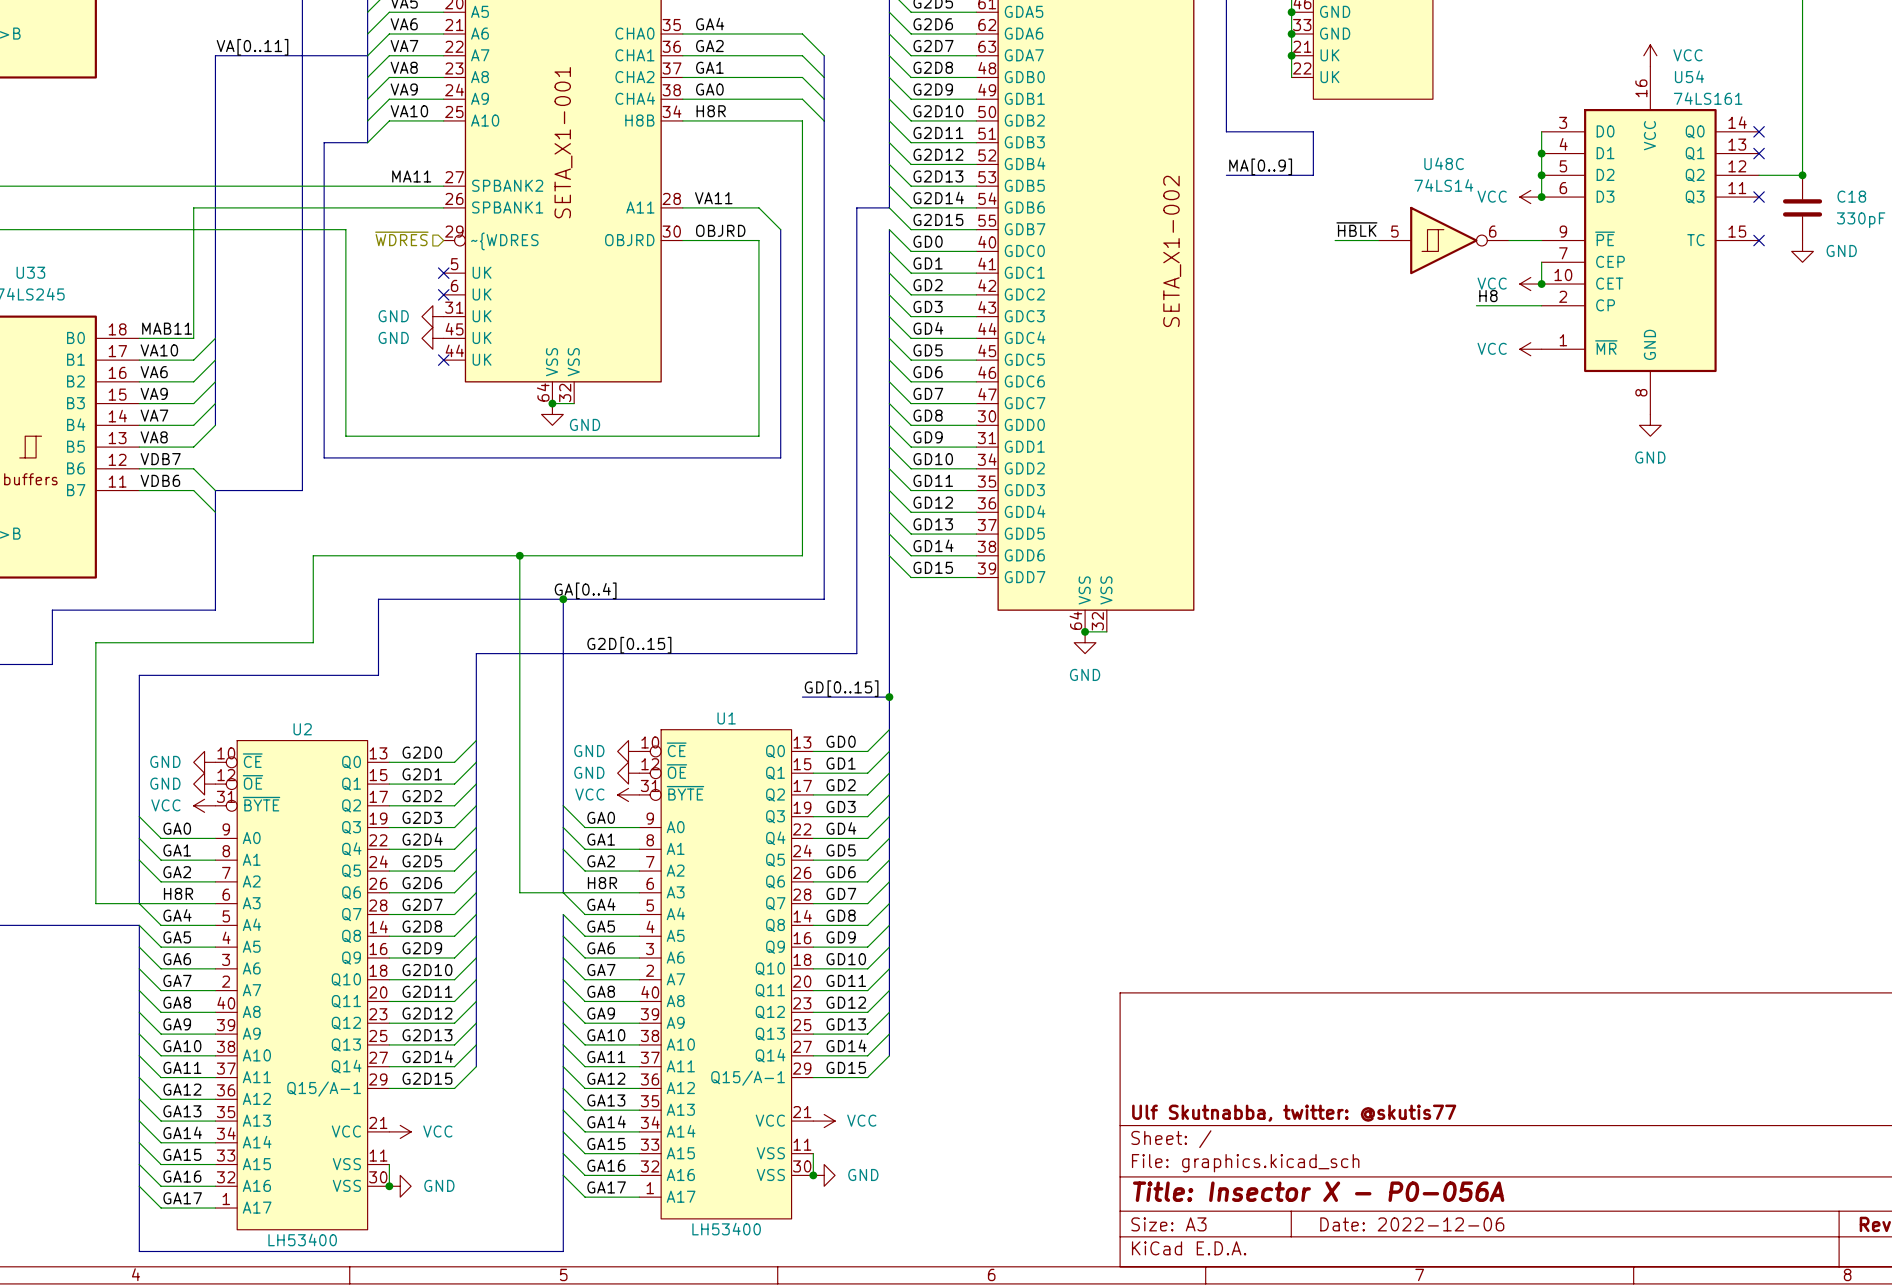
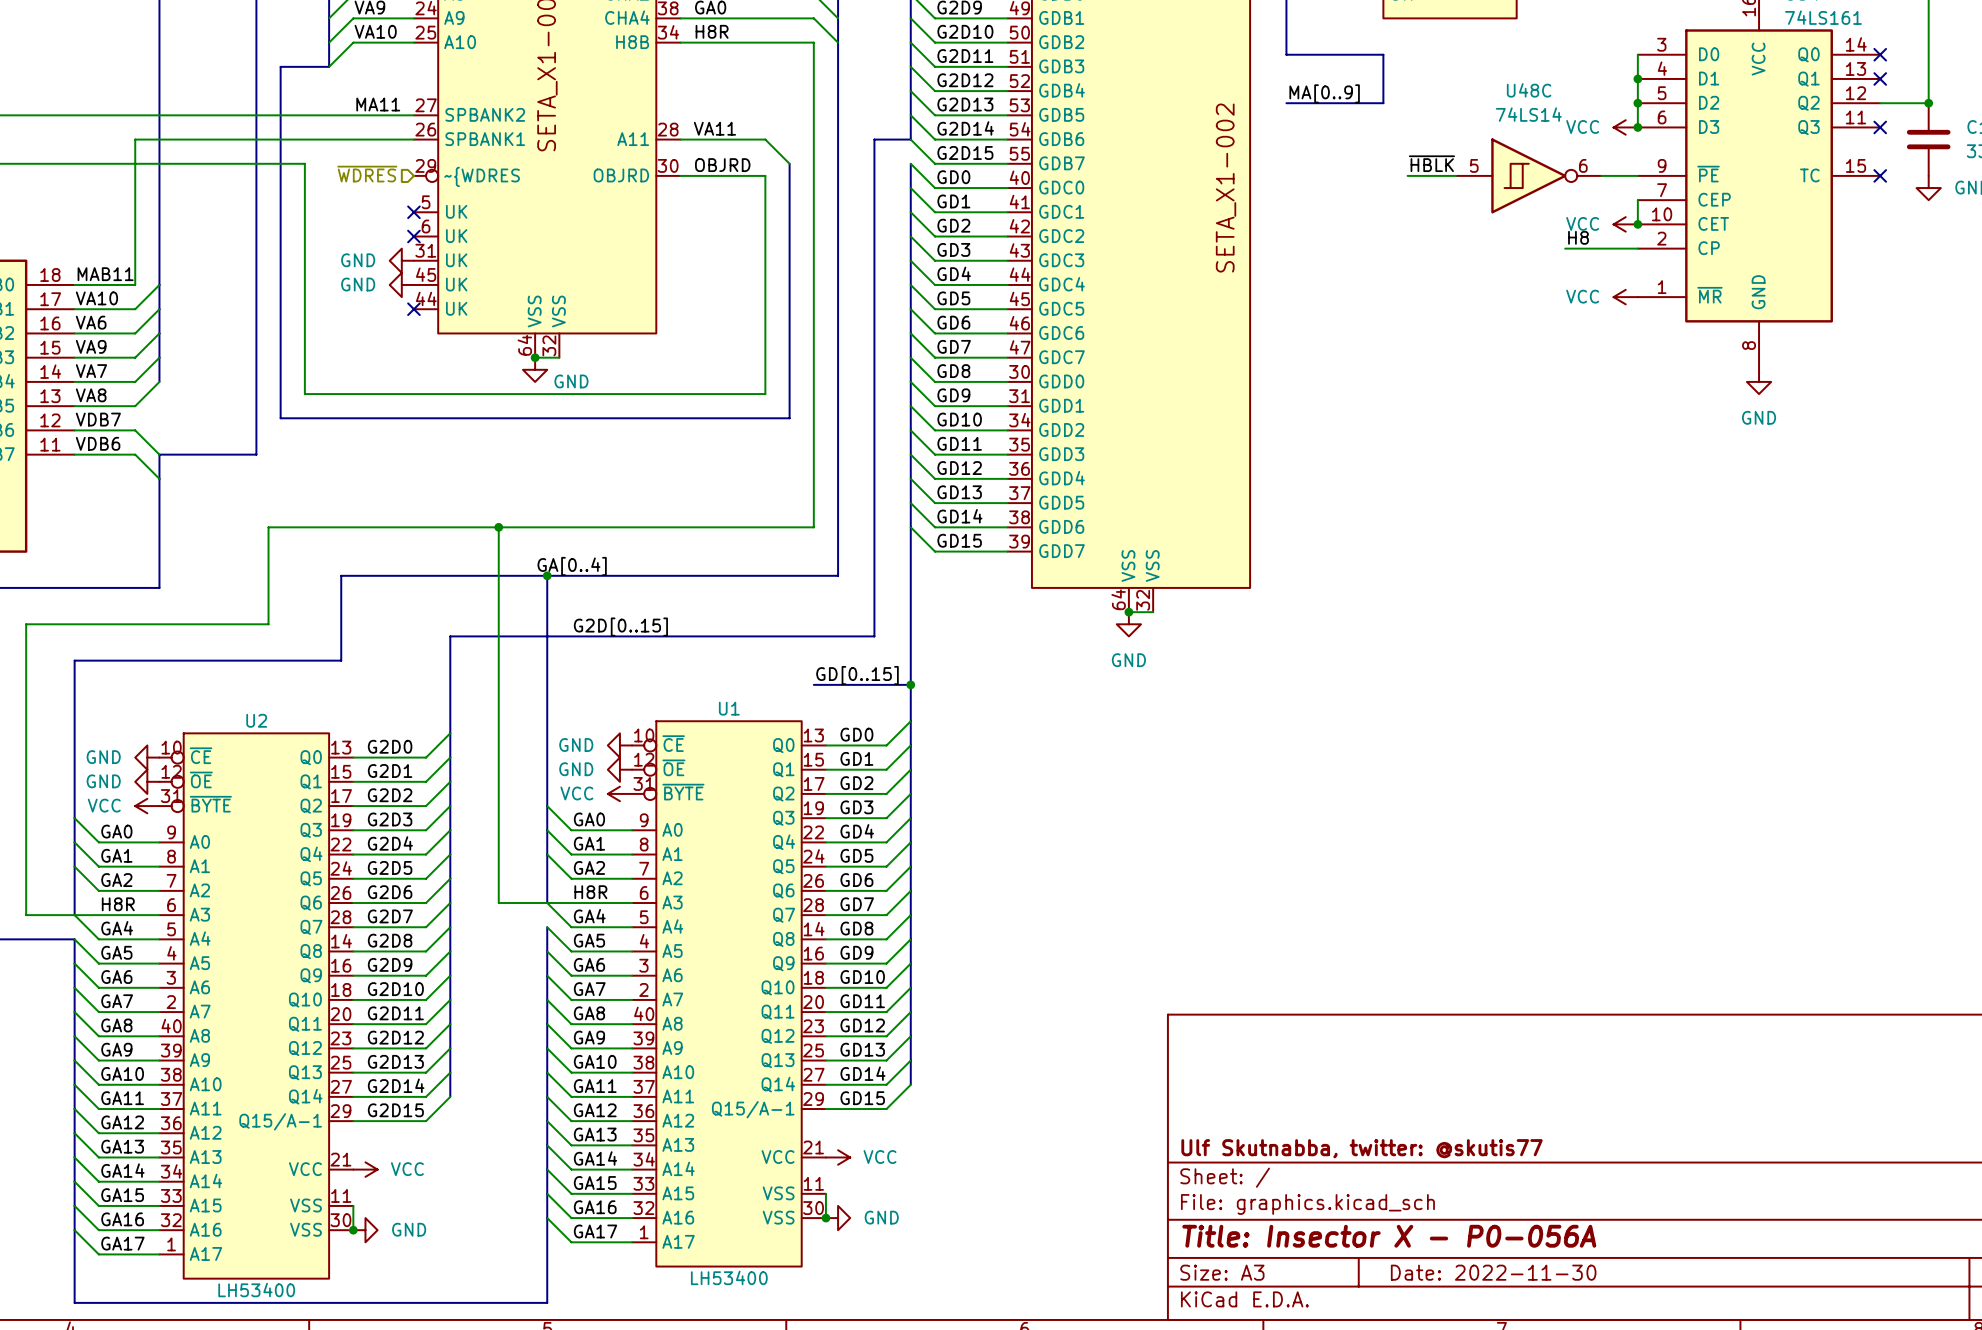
title block: Date: 2022-12-06 (1412, 1224) -> Date: 2022-11-30 (1493, 1272)

